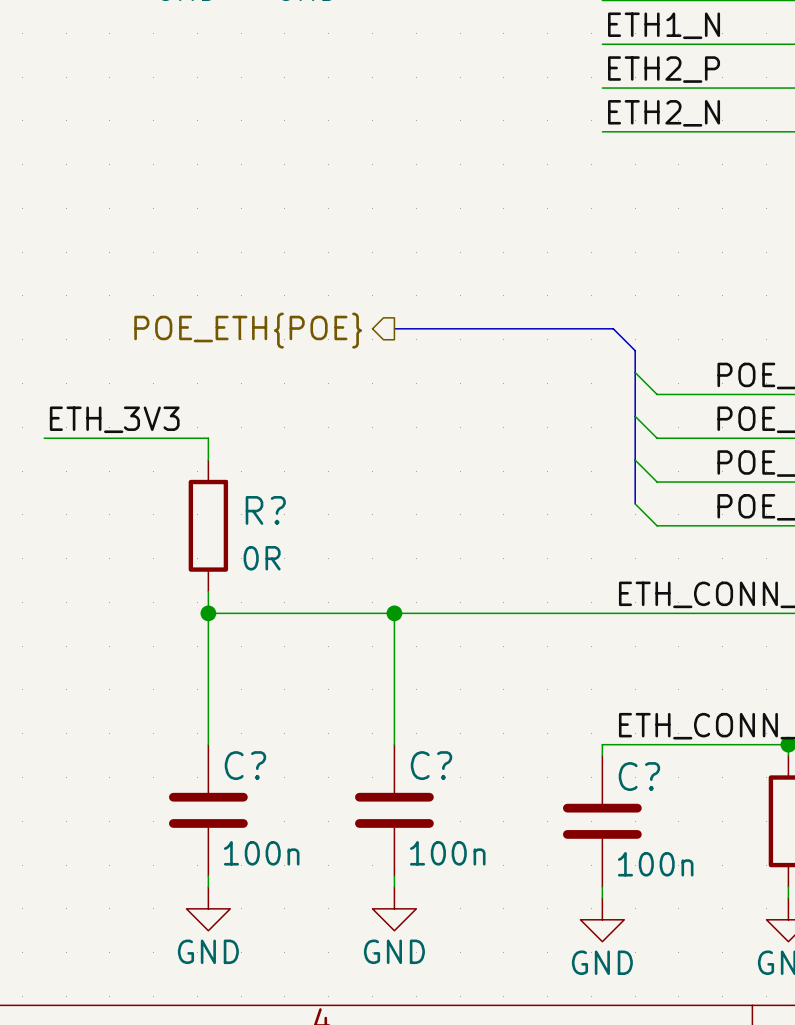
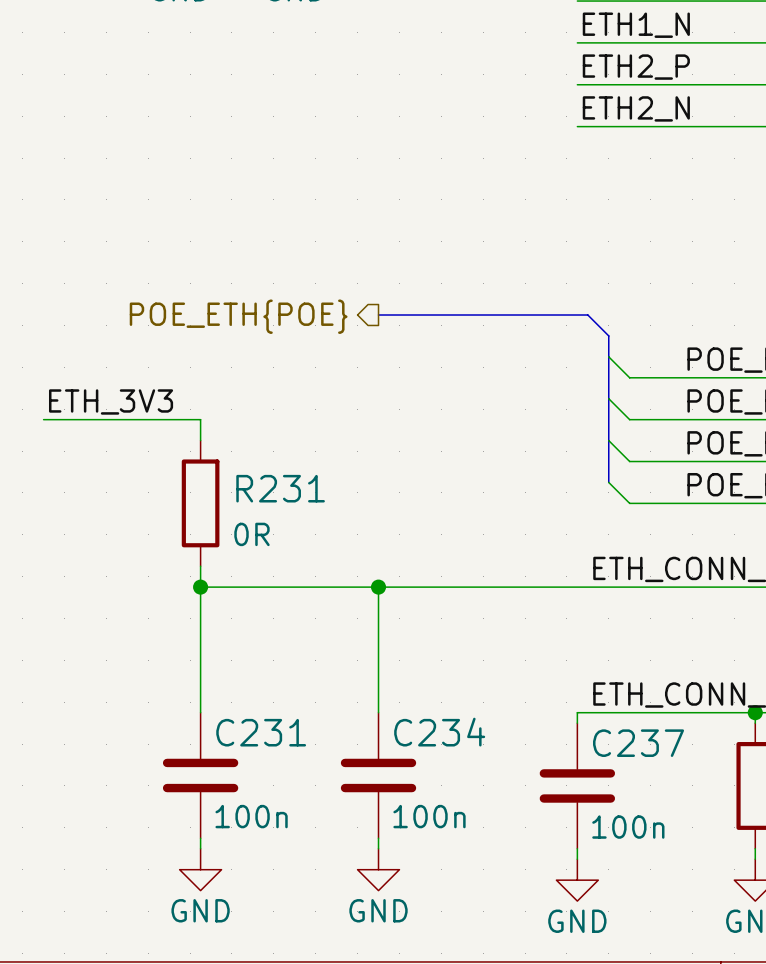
R? name: R? (265, 510) -> R231 (280, 488)
C? name: C? (245, 765) -> C231 (261, 732)
C? name: C? (431, 765) -> C234 (439, 732)
C? name: C? (639, 776) -> C237 (638, 743)

